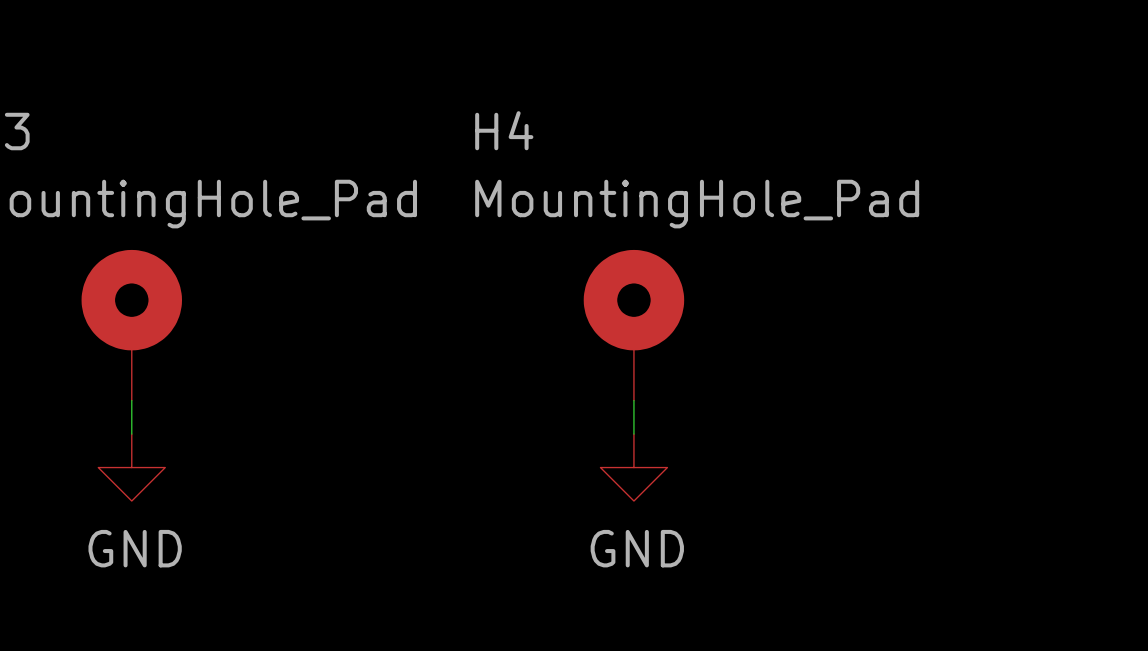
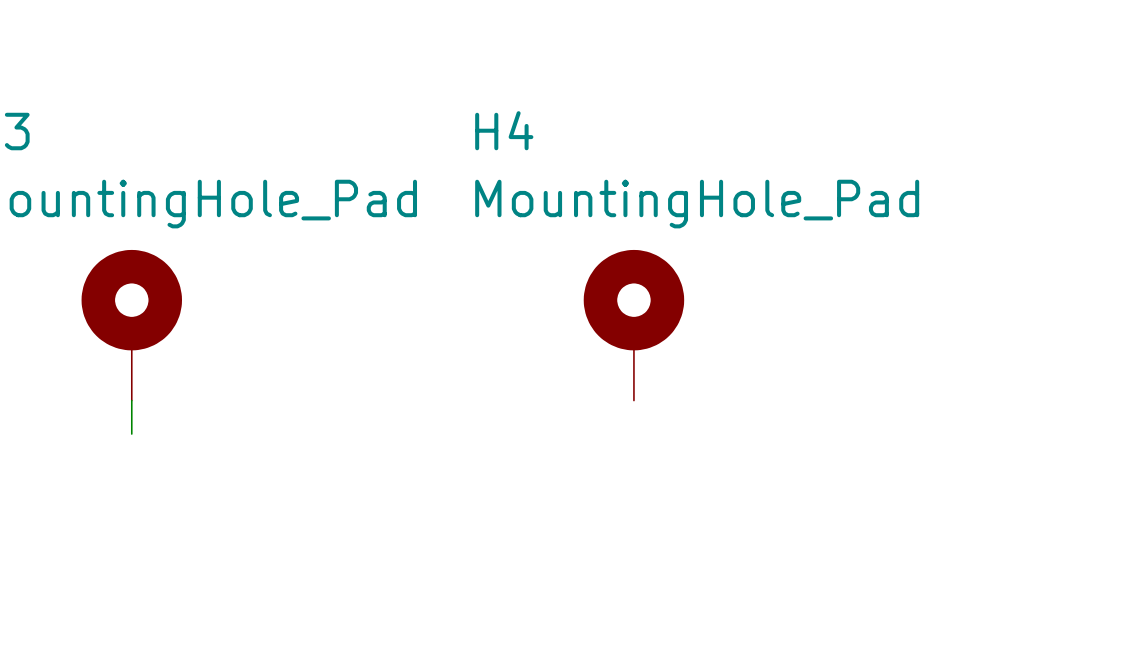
wire: (633, 400) (633, 434) -> none
power symbol: GND (131, 467) -> none
power symbol: GND (633, 467) -> none

